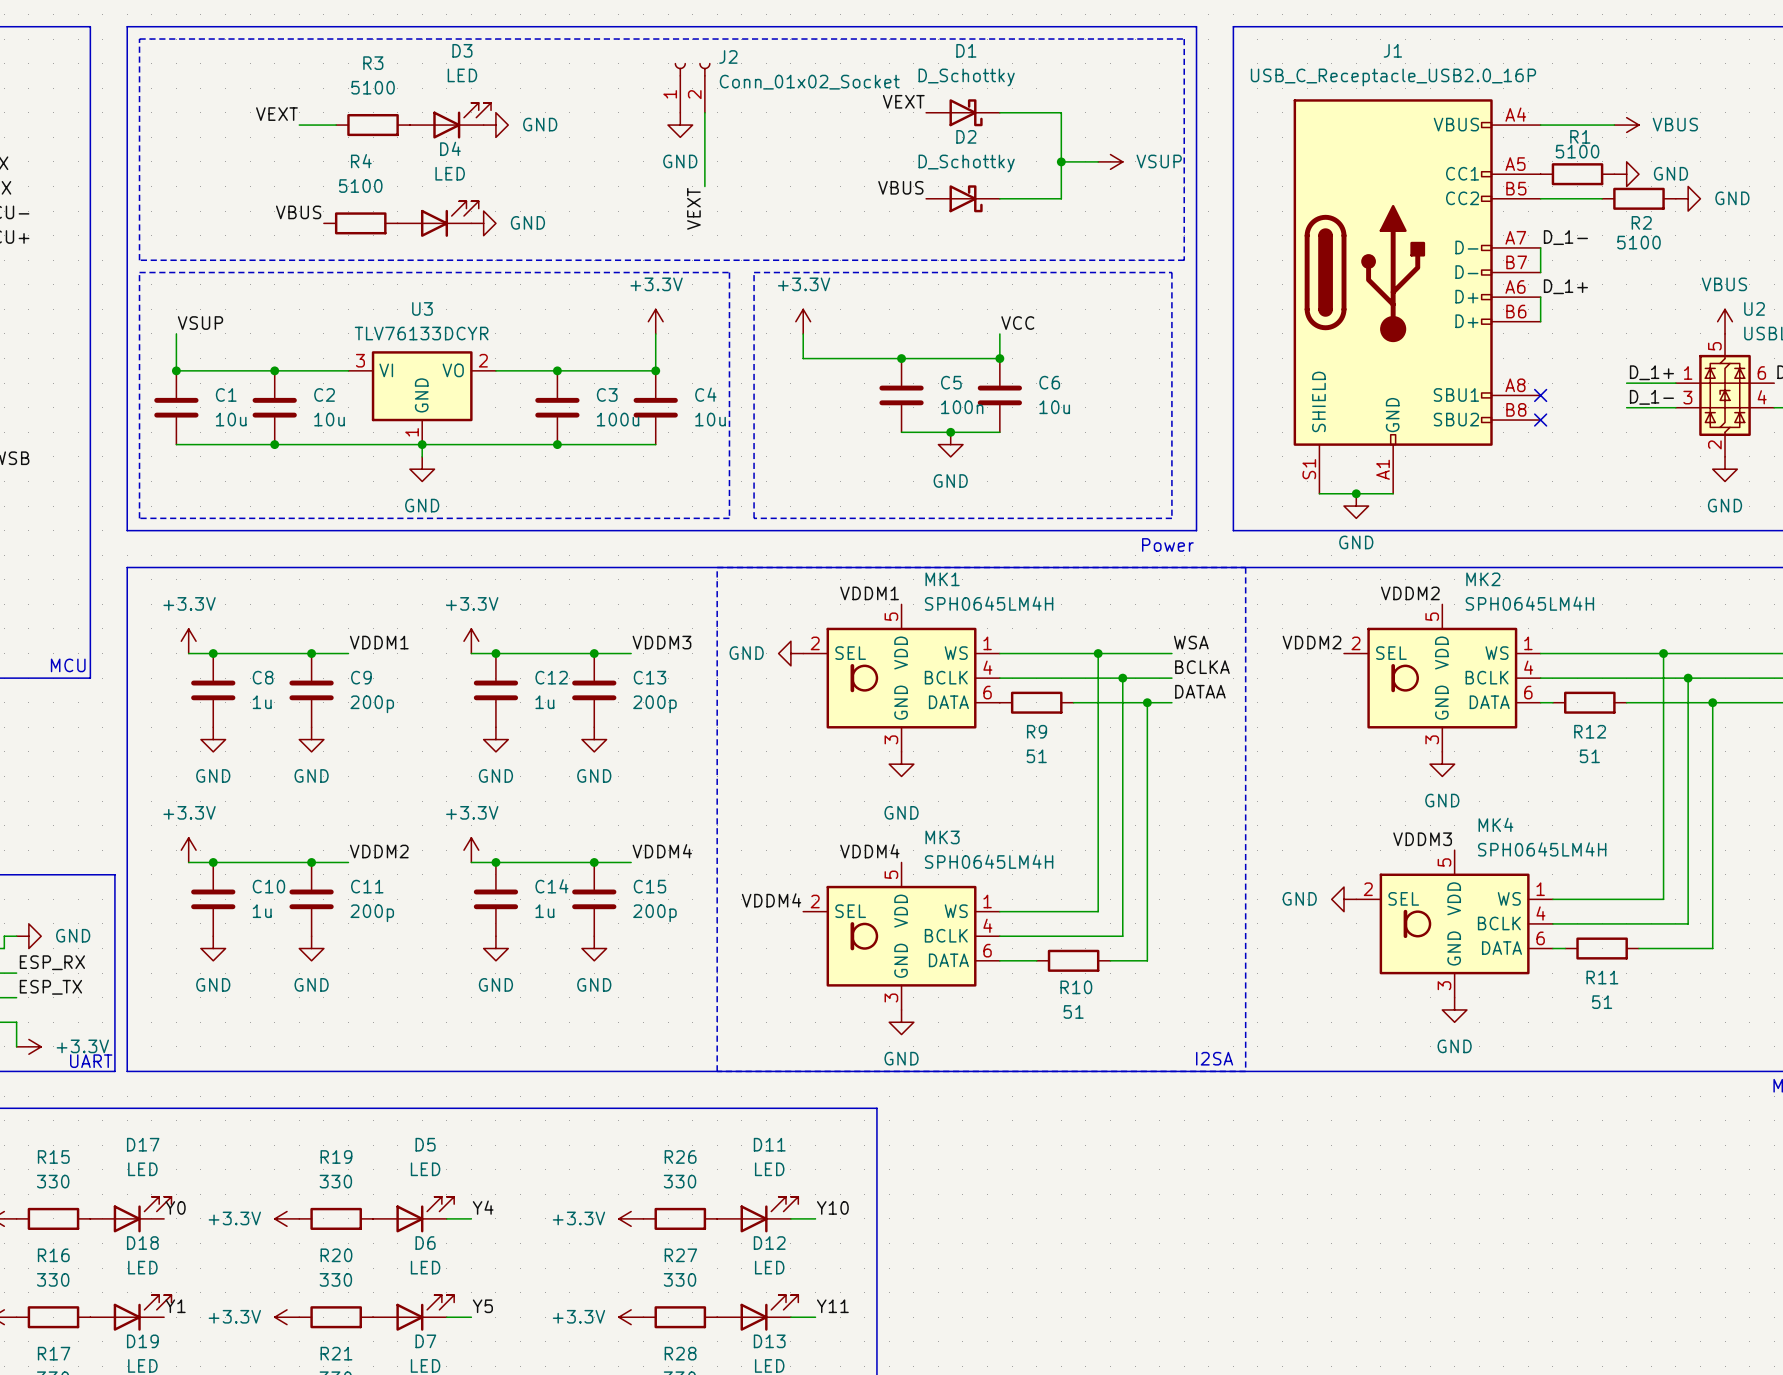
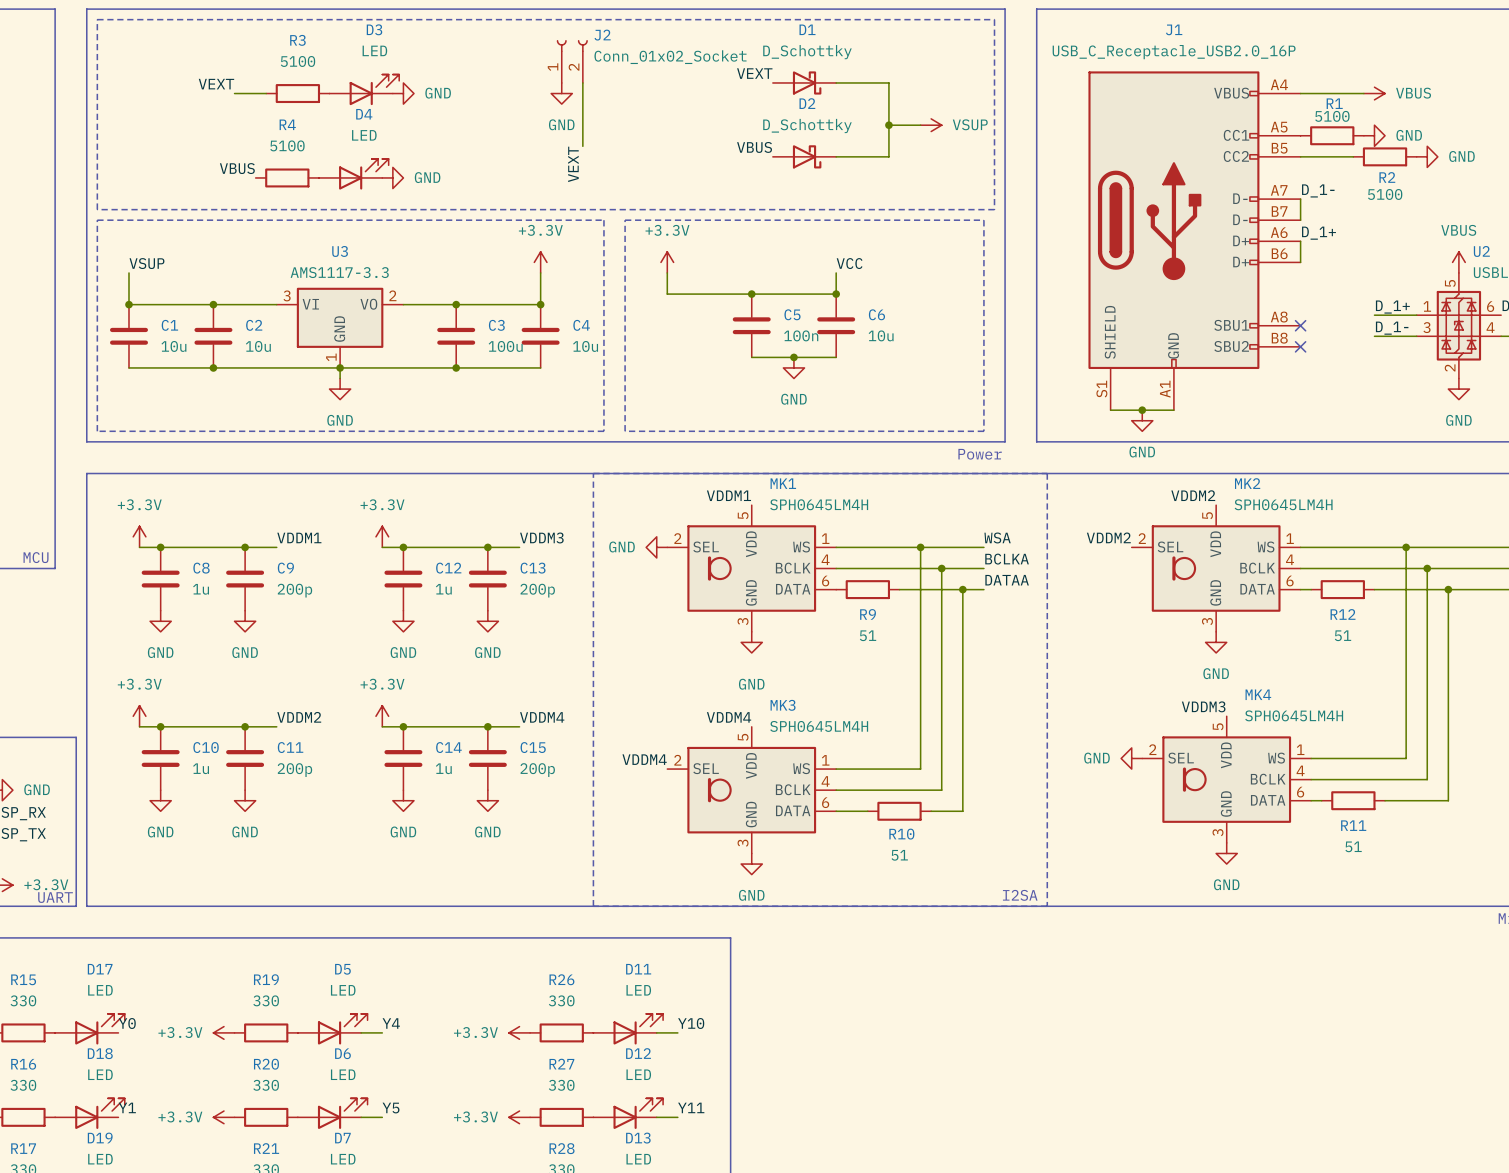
U3 value: TLV76133DCYR (421, 333) -> AMS1117-3.3 (339, 272)

